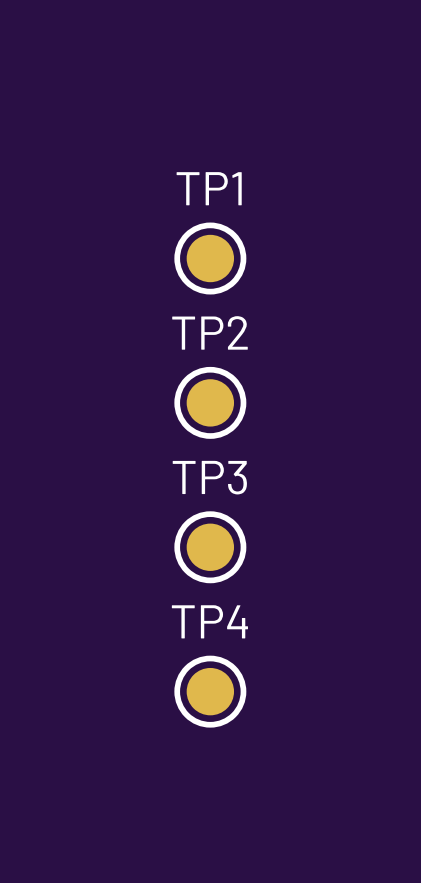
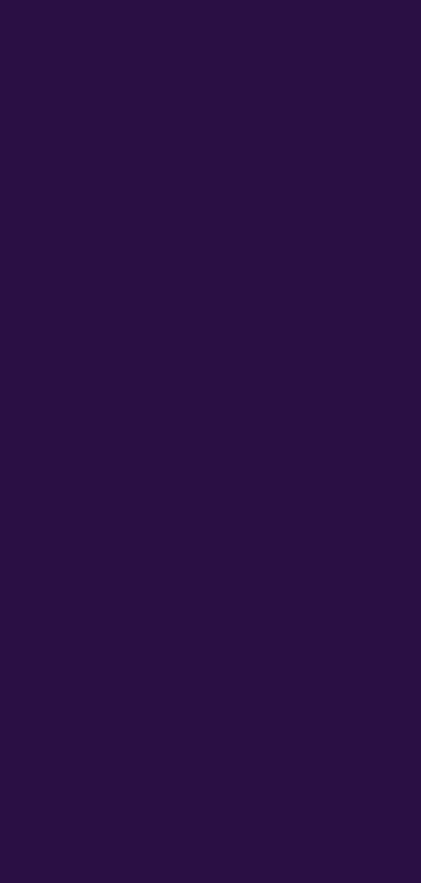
TP1: (210, 258) -> none
TP2: (210, 402) -> none
TP3: (210, 547) -> none
TP4: (210, 691) -> none

